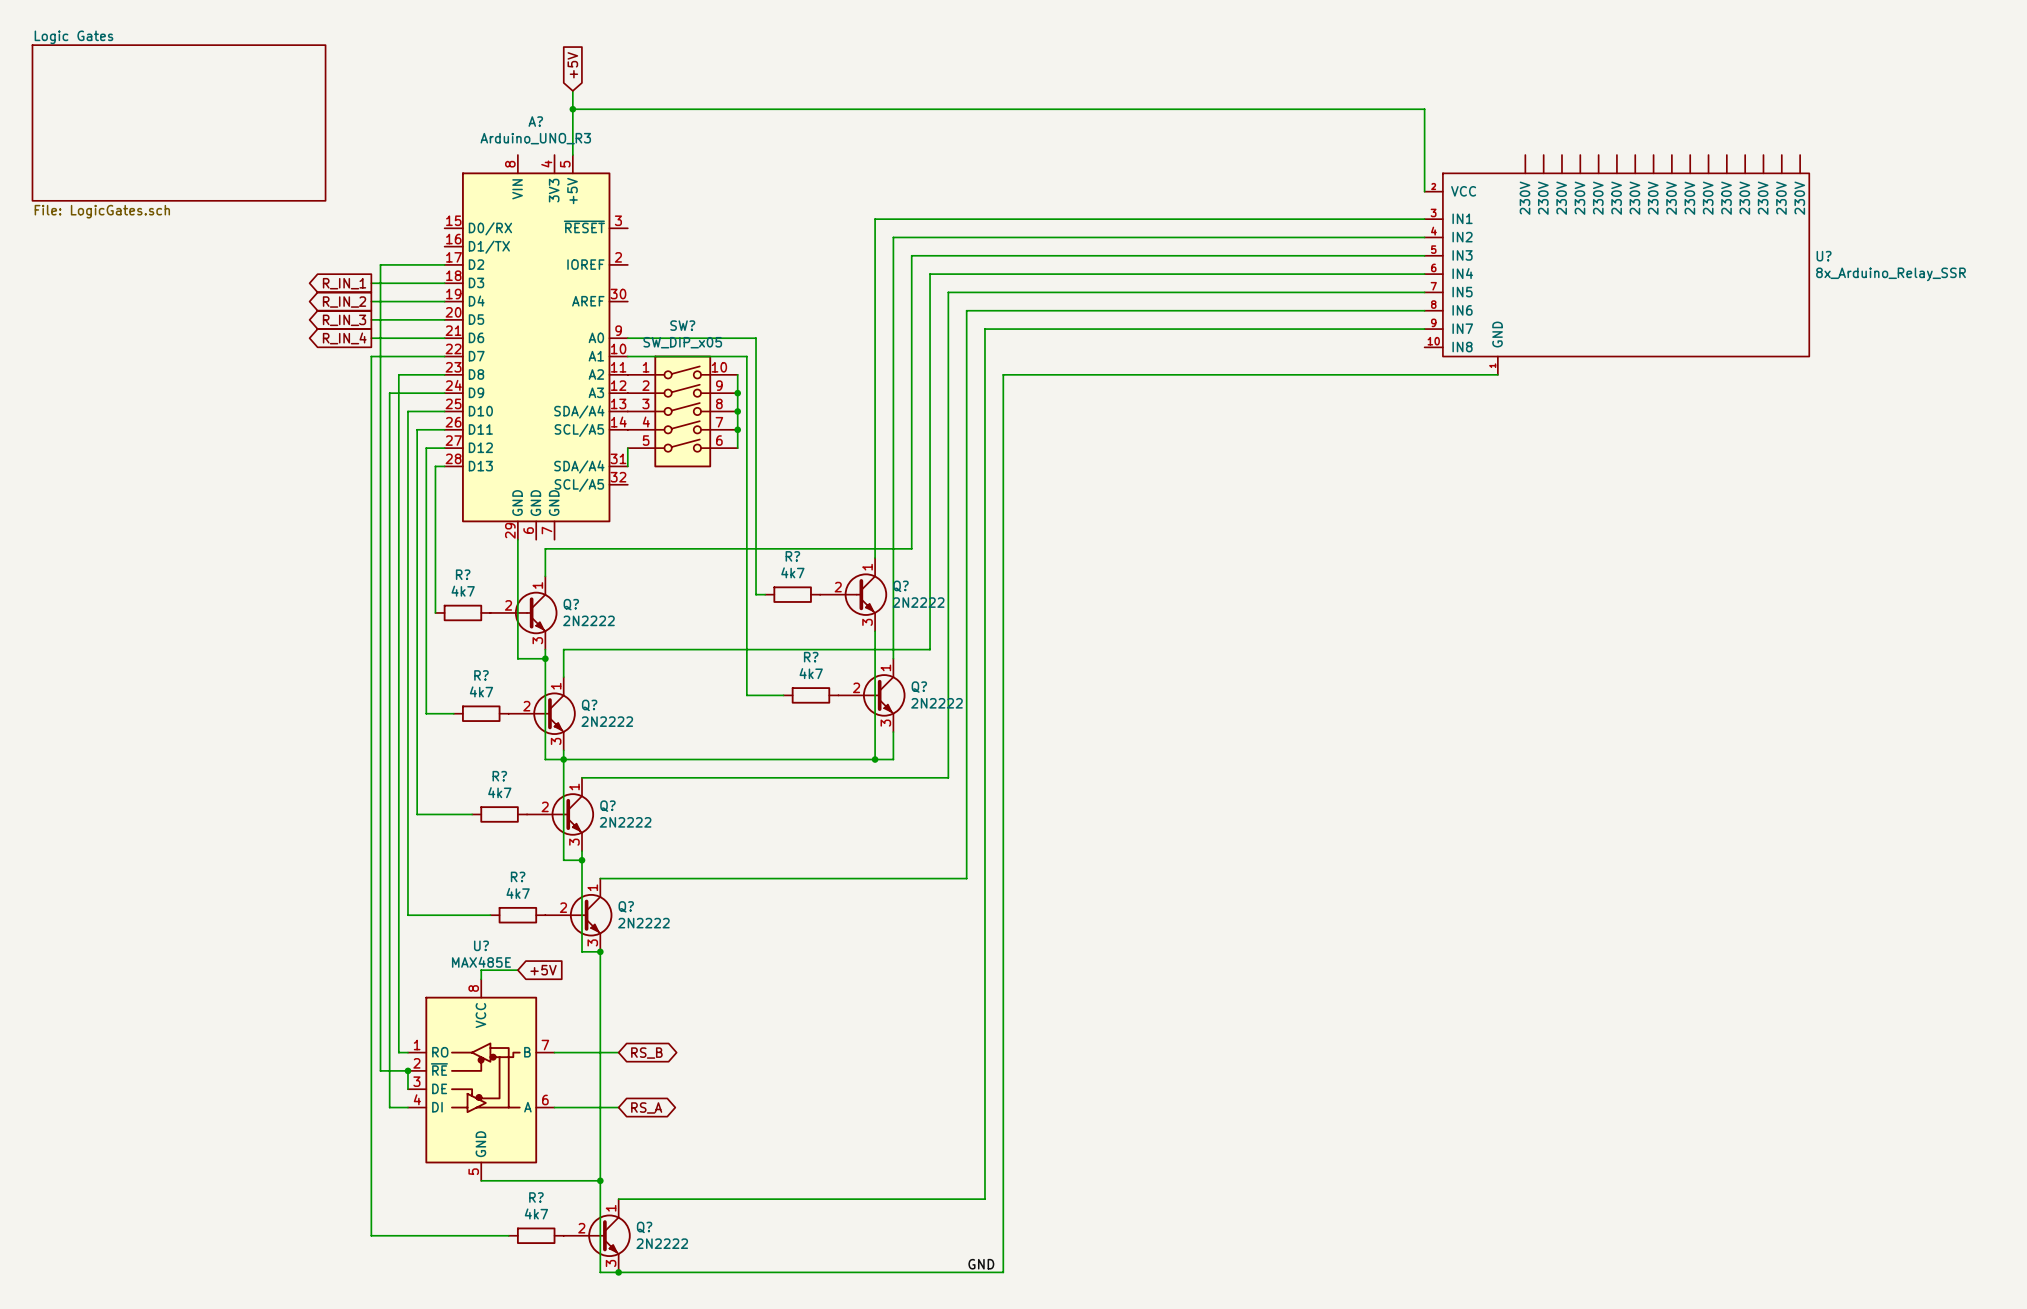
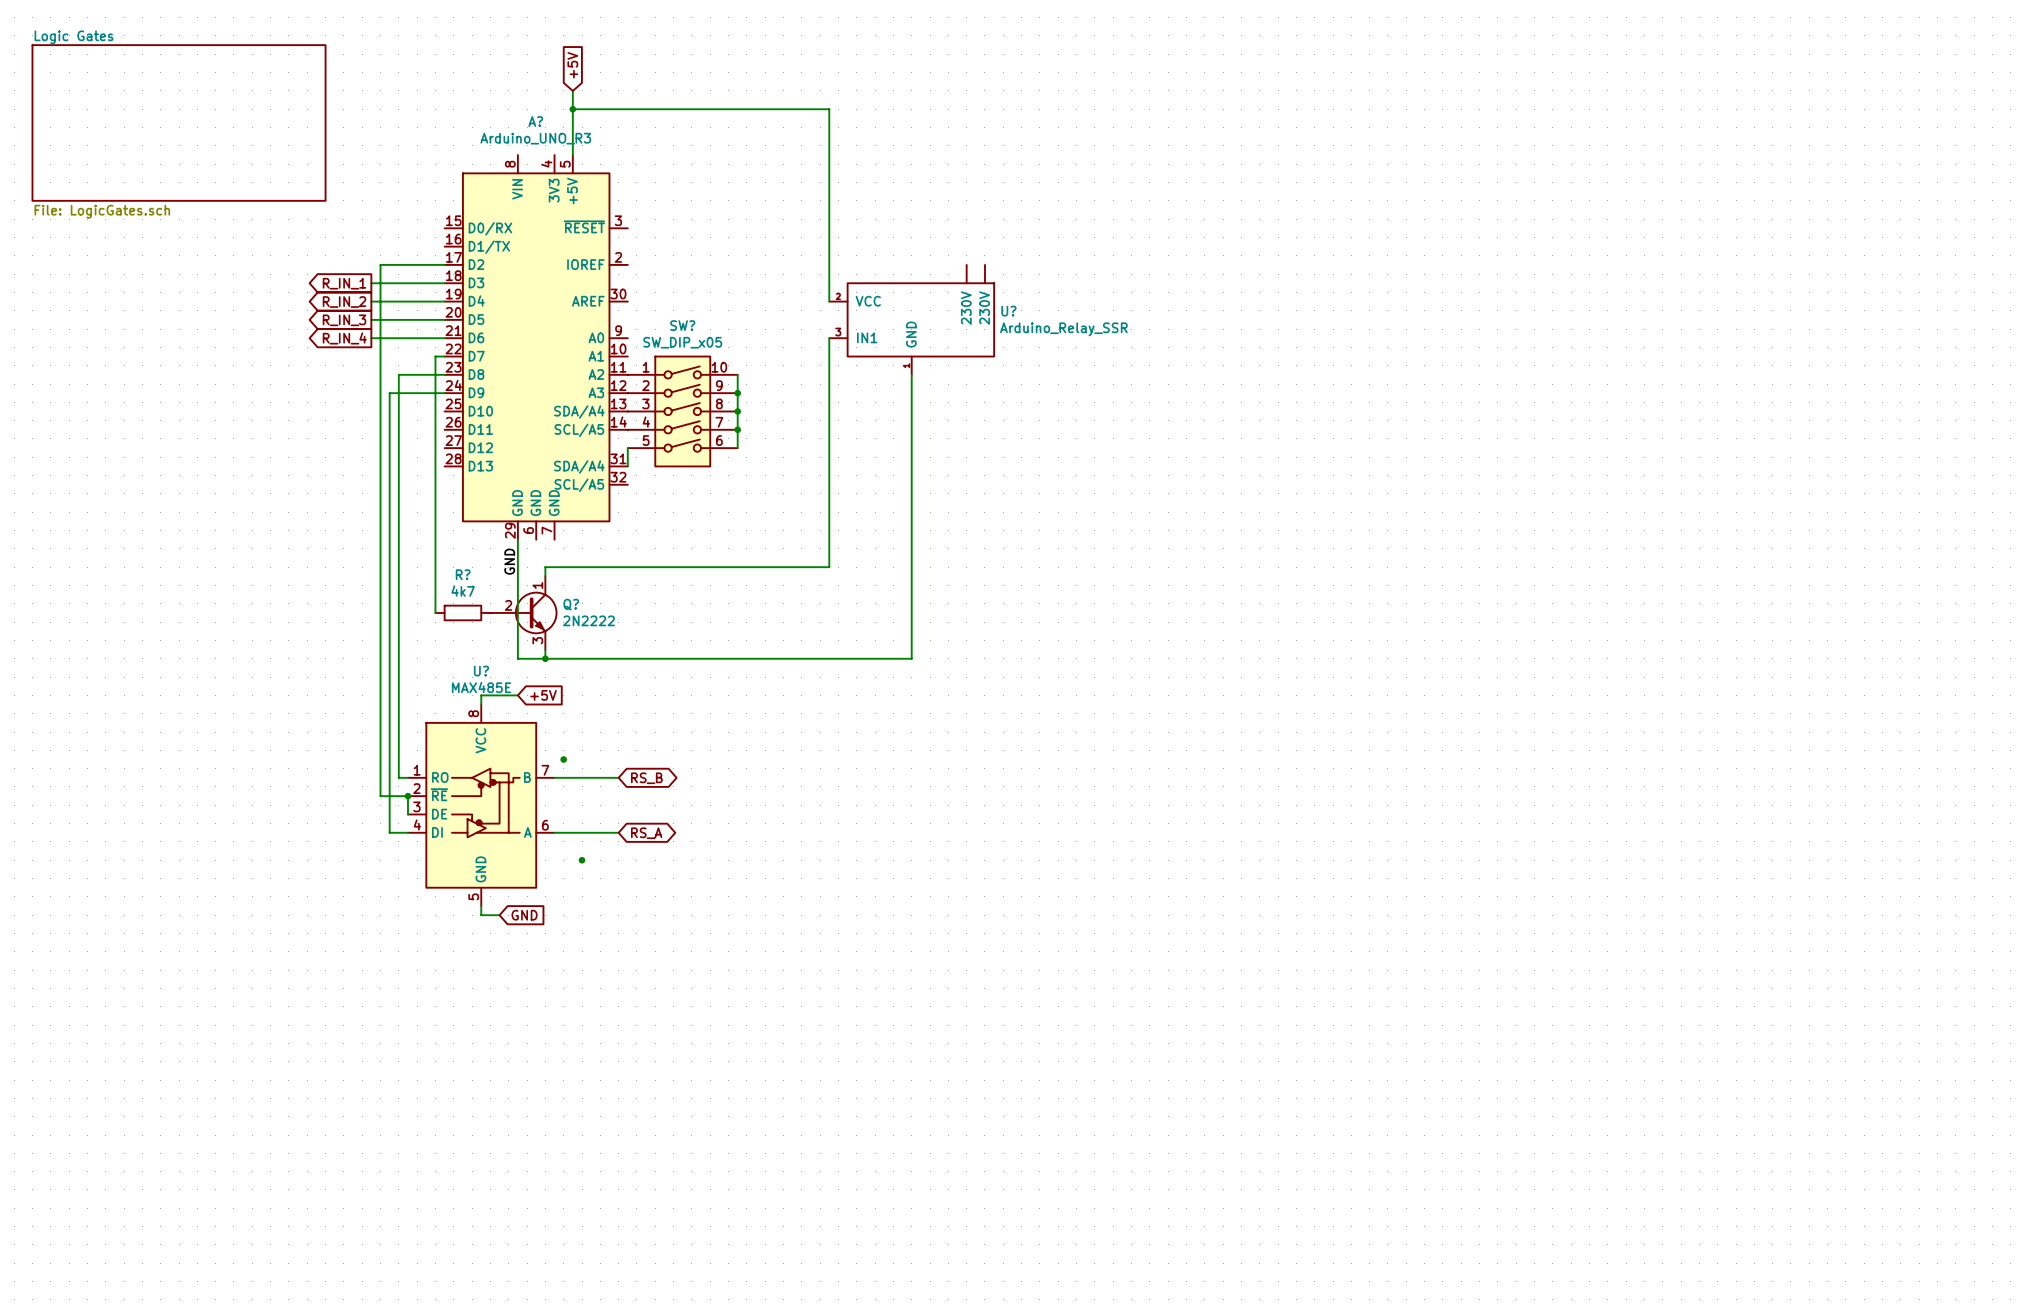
wire: (829, 109) (1424, 109) (1424, 191) -> (829, 109) (829, 301)
wire: (1424, 219) (875, 219) (875, 558) -> none
wire: (1424, 237) (893, 237) (893, 658) -> none
wire: (1424, 255) (911, 255) (911, 374) -> none
U?: 8x_Arduino_Relay_SSR (1616, 264) -> none
wire: (1424, 274) (930, 274) (930, 649) (563, 649) (563, 677) -> none
wire: (1424, 292) (948, 292) (948, 777) (618, 777) -> none
wire: (1424, 310) (966, 310) (966, 878) (600, 878) -> none
U?: none -> Arduino_Relay_SSR (911, 319)
wire: (1424, 329) (984, 329) (984, 1199) (618, 1199) -> none
wire: (627, 338) (756, 338) (756, 594) (765, 594) -> none
wire: none -> (829, 338) (829, 567) (545, 567)
wire: (435, 356) (371, 356) (371, 1235) (508, 1235) -> none
wire: (627, 356) (746, 356) (746, 695) (783, 695) -> none
wire: (1497, 374) (1003, 374) (1003, 1272) (600, 1272) (600, 951) (582, 951) (582, 851) -> none
wire: (444, 411) (407, 411) (407, 796) -> none
wire: (444, 429) (417, 429) (417, 814) (472, 814) -> none
wire: (444, 448) (426, 448) (426, 713) (453, 713) -> none
wire: (435, 466) (444, 466) -> (435, 466) (435, 356)
wire: (911, 548) (545, 548) (545, 567) -> (911, 548) (911, 658) (545, 658)
label: none -> GND (509, 561)
R?: 4k7 (792, 594) -> none
Q?: 2N2222 (853, 594) -> none
wire: (875, 631) (875, 759) -> none
wire: (545, 658) (545, 759) (893, 759) (893, 732) -> none
wire: none -> (517, 695) (481, 695) (481, 704)
global label: none -> +5V (543, 695)
R?: 4k7 (810, 695) -> none
Q?: 2N2222 (871, 695) -> none
R?: 4k7 (481, 713) -> none
Q?: 2N2222 (542, 713) -> none
wire: (563, 750) (563, 860) (582, 860) -> none
junction: (875, 759) -> none
wire: (398, 777) (398, 1052) (407, 1052) -> (398, 777) (407, 777)
wire: none -> (554, 777) (582, 777)
global label: none -> RS_B (646, 778)
wire: (380, 796) (380, 1070) (407, 1070) (407, 1089) -> (380, 796) (407, 796)
junction: none -> (407, 796)
U?: none -> MAX485E (481, 805)
wire: (407, 814) (407, 915) (481, 915) -> (481, 906) (481, 915)
R?: 4k7 (499, 814) -> none
Q?: 2N2222 (560, 814) -> none
wire: (389, 832) (389, 1107) (407, 1107) -> (389, 832) (407, 832)
wire: none -> (554, 832) (618, 832)
global label: none -> RS_A (646, 833)
R?: 4k7 (517, 915) -> none
global label: none -> GND (524, 915)
Q?: 2N2222 (578, 915) -> none
junction: (600, 951) -> none
wire: (517, 970) (481, 970) (481, 979) -> none
global label: +5V (543, 970) -> none
wire: (554, 1052) (618, 1052) -> none
global label: RS_B (646, 1053) -> none
junction: (407, 1070) -> none
U?: MAX485E (481, 1080) -> none
wire: (554, 1107) (618, 1107) -> none
global label: RS_A (646, 1107) -> none
wire: (481, 1180) (600, 1180) -> none
junction: (600, 1180) -> none
R?: 4k7 (536, 1235) -> none
Q?: 2N2222 (597, 1235) -> none
label: GND (981, 1264) -> none
junction: (618, 1272) -> none

